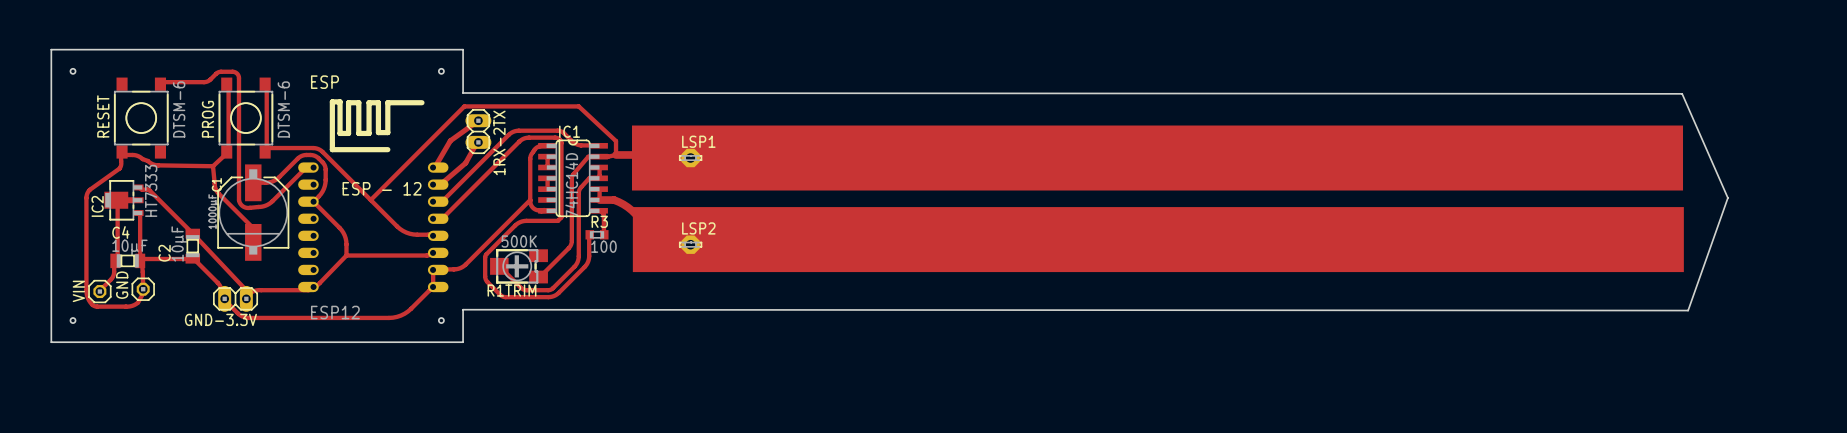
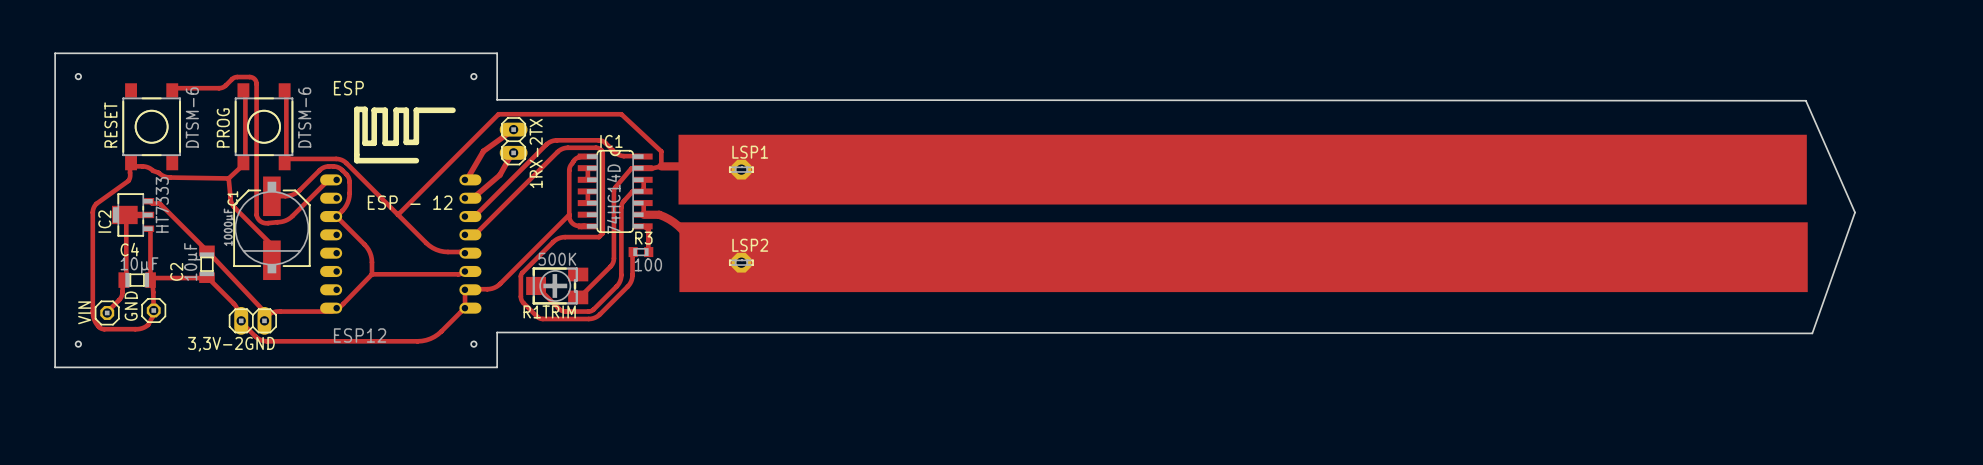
GND-3.3V name: GND-3.3V (220, 319) -> 3,3V-2GND (231, 344)

